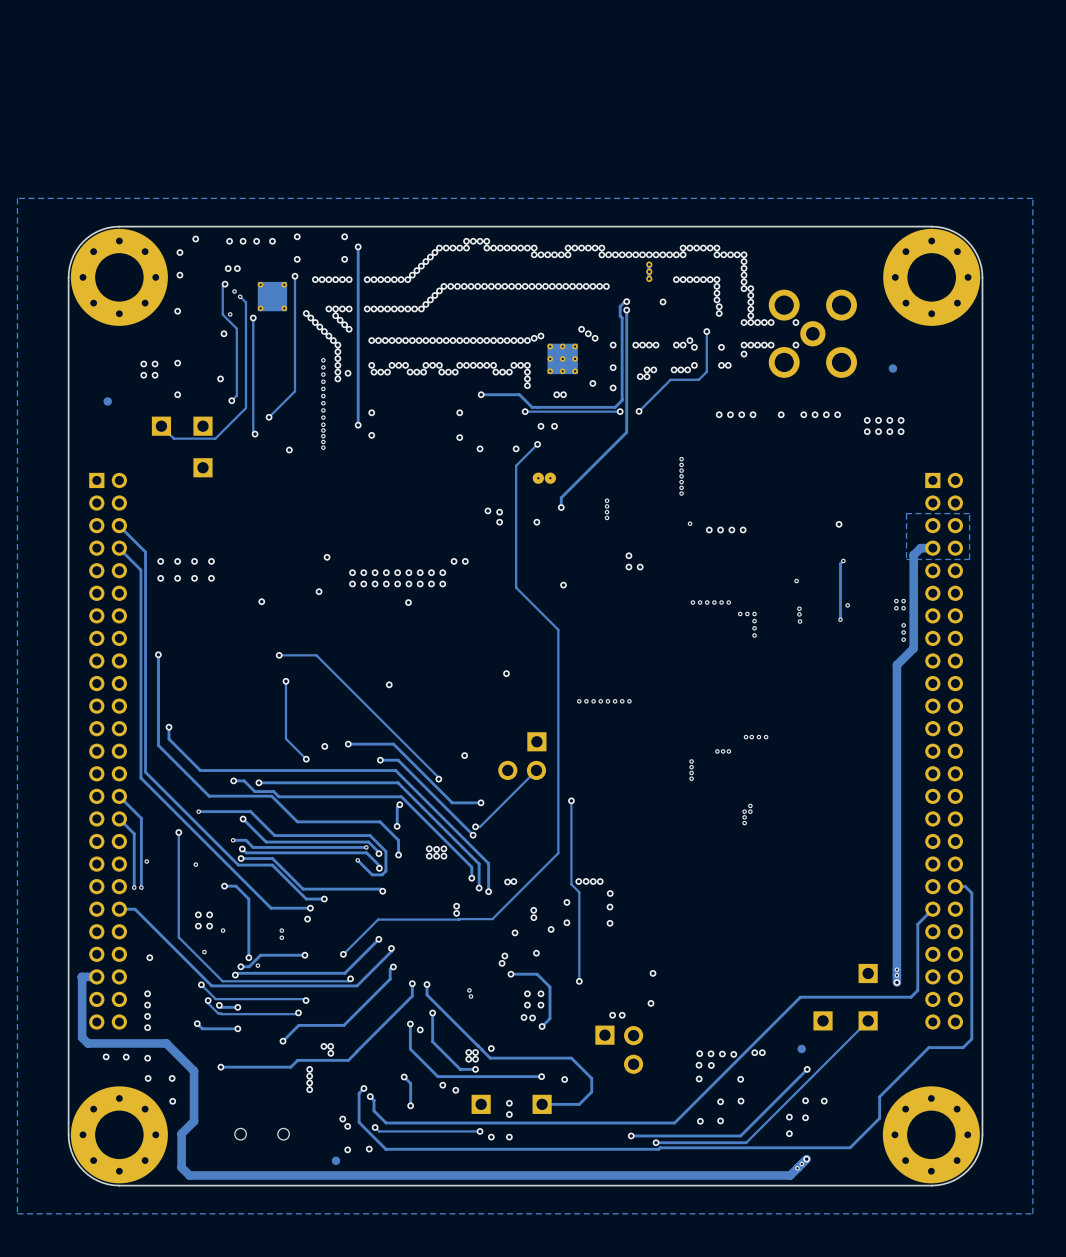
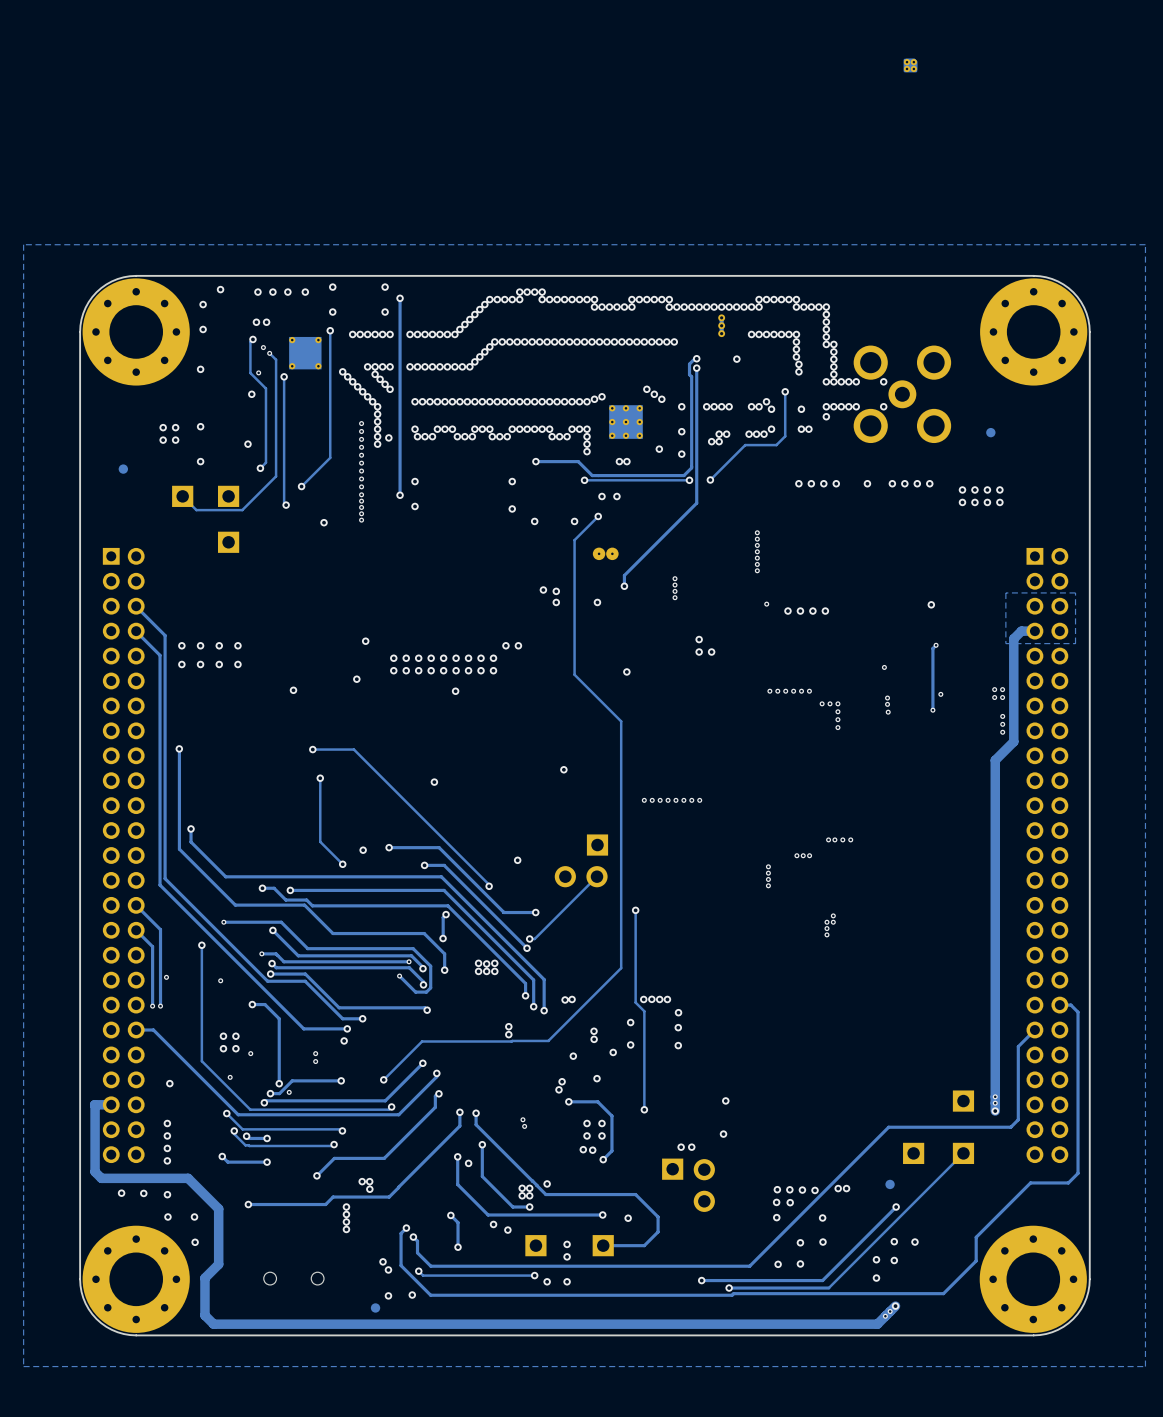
part: none -> (910, 65)

